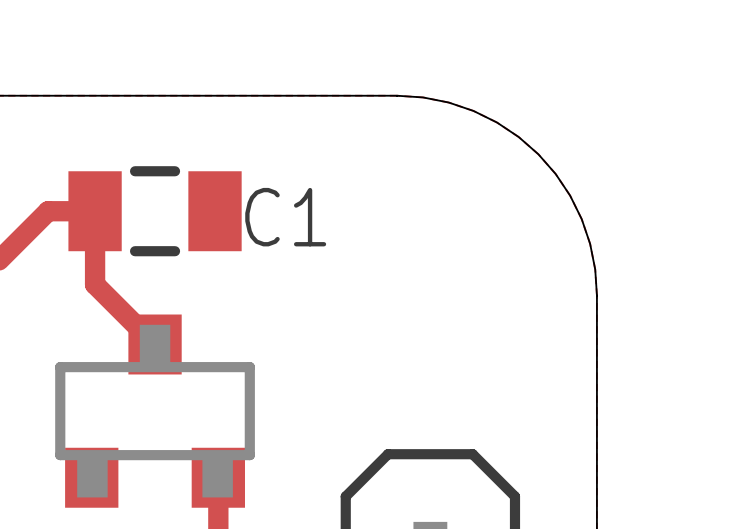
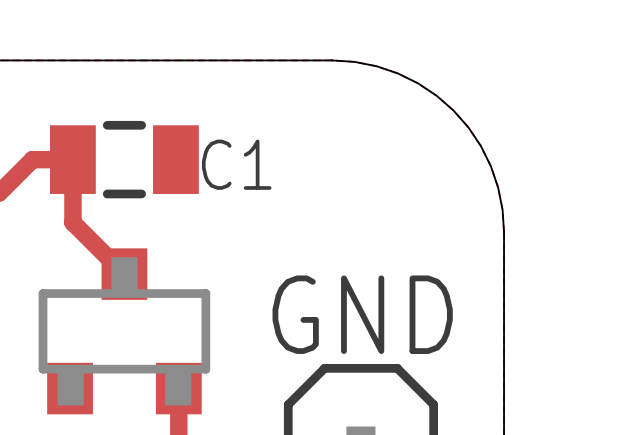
text: none -> GND (362, 314)

